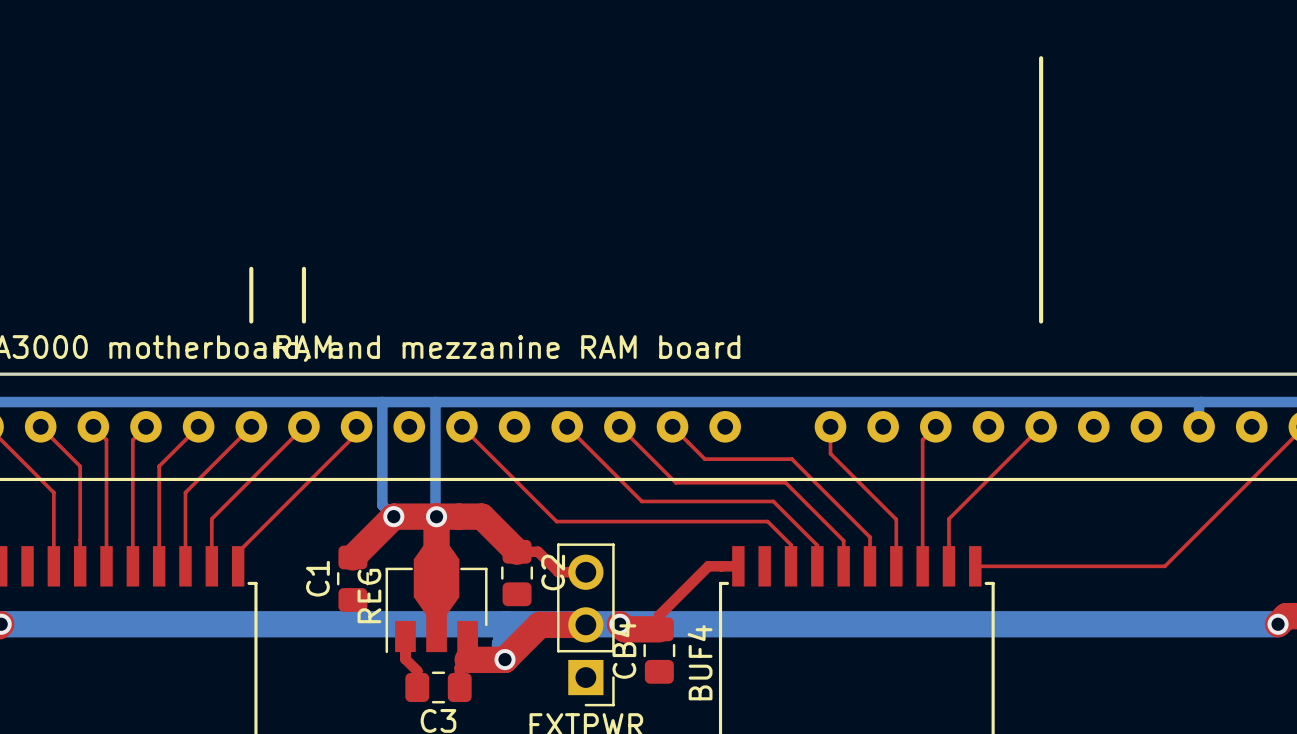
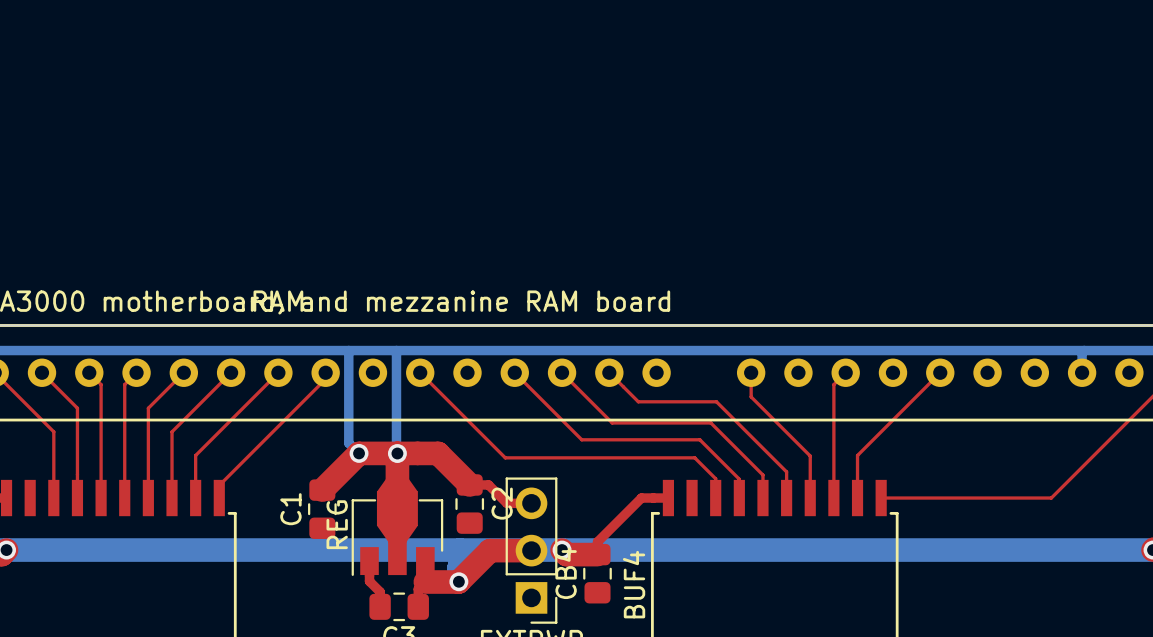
line: (1041, 58) (1041, 321) -> none
line: (251, 268) (251, 321) -> none
line: (303, 268) (303, 321) -> none

